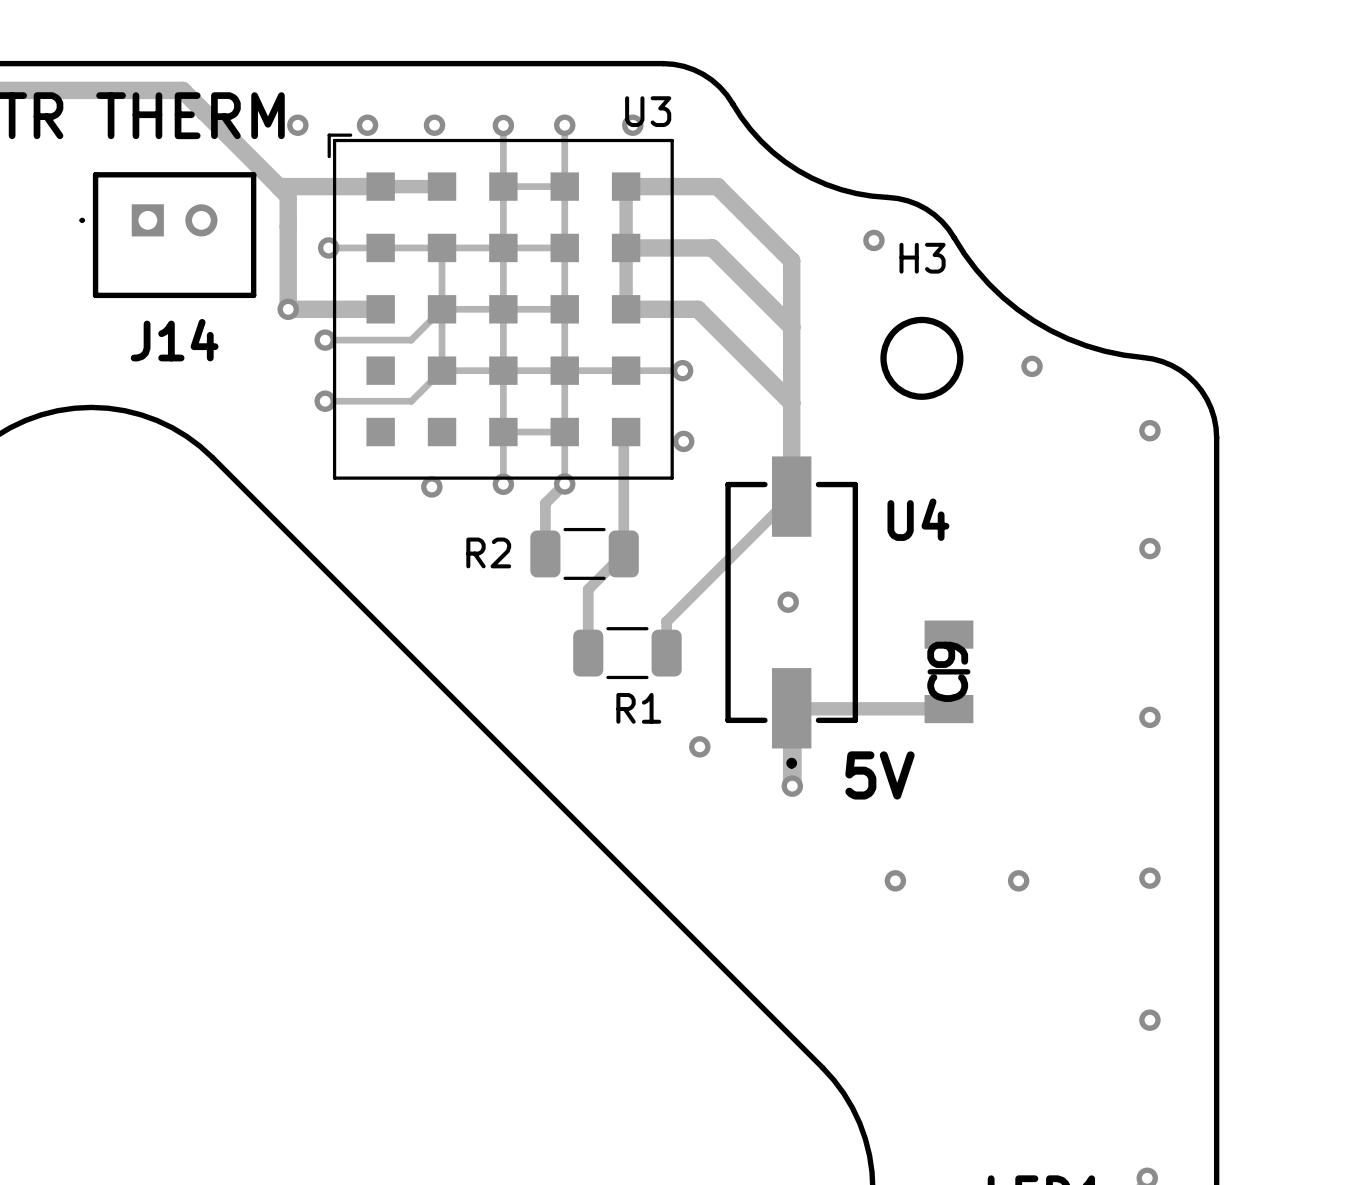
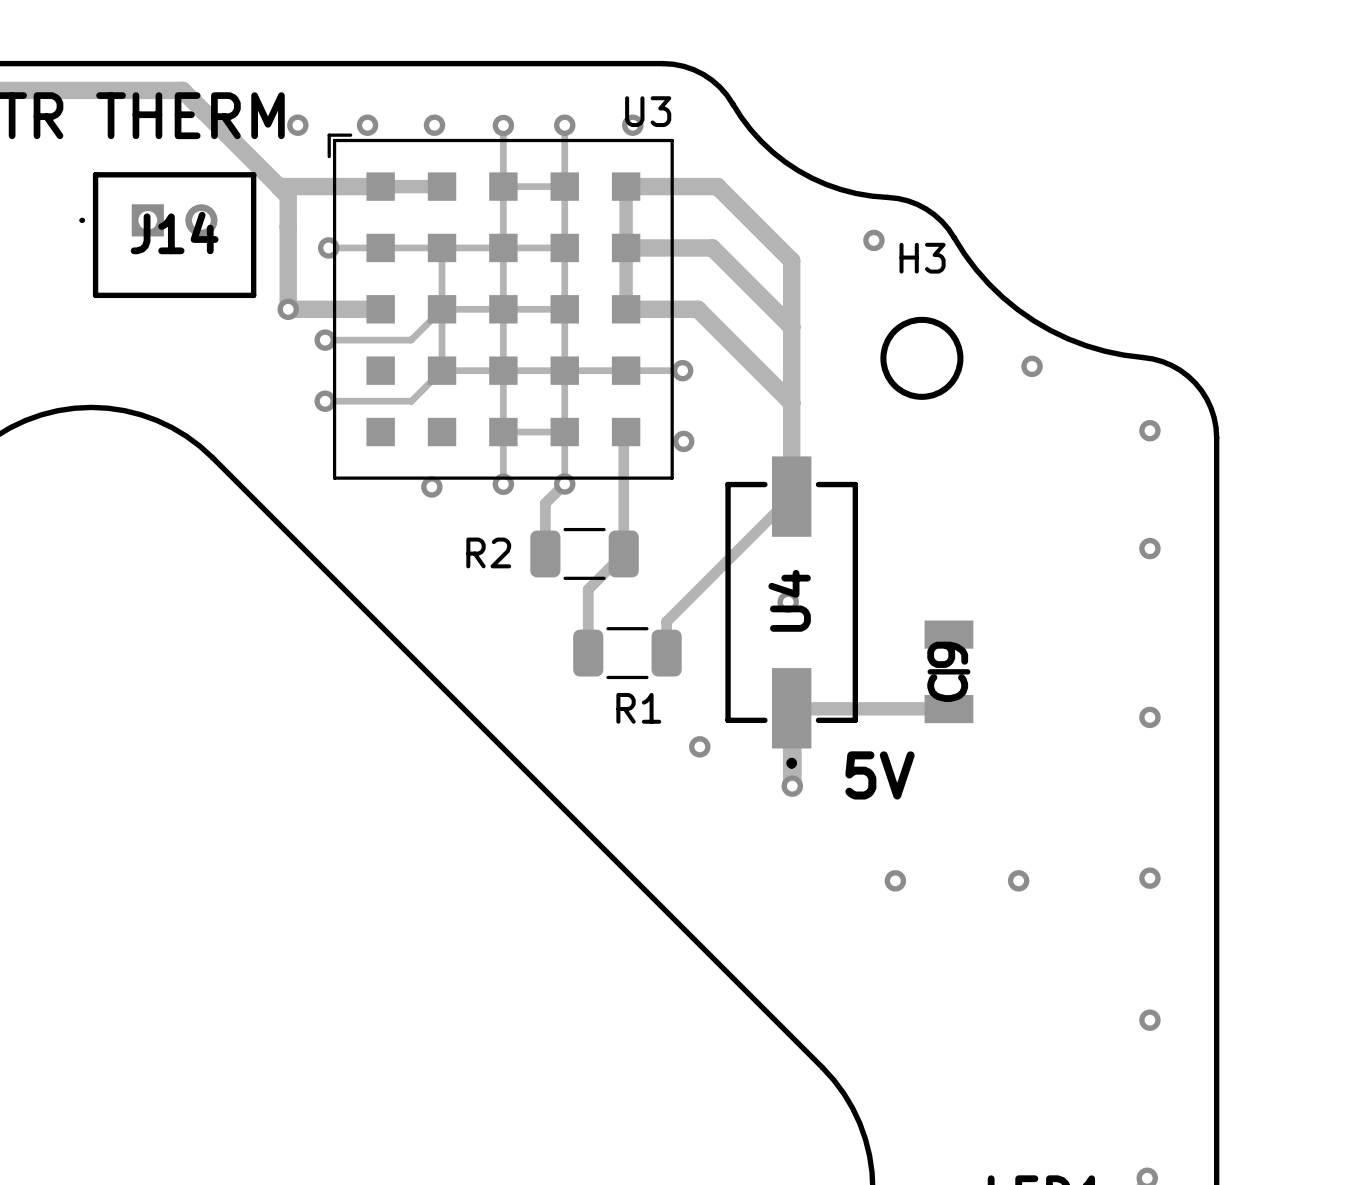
J14 name position: J14 (174, 340) -> J14 (174, 233)
U4 name rotation: 0° (918, 519) -> 90° counterclockwise (789, 600)
U4 name position: U4 (918, 519) -> U4 (789, 600)

